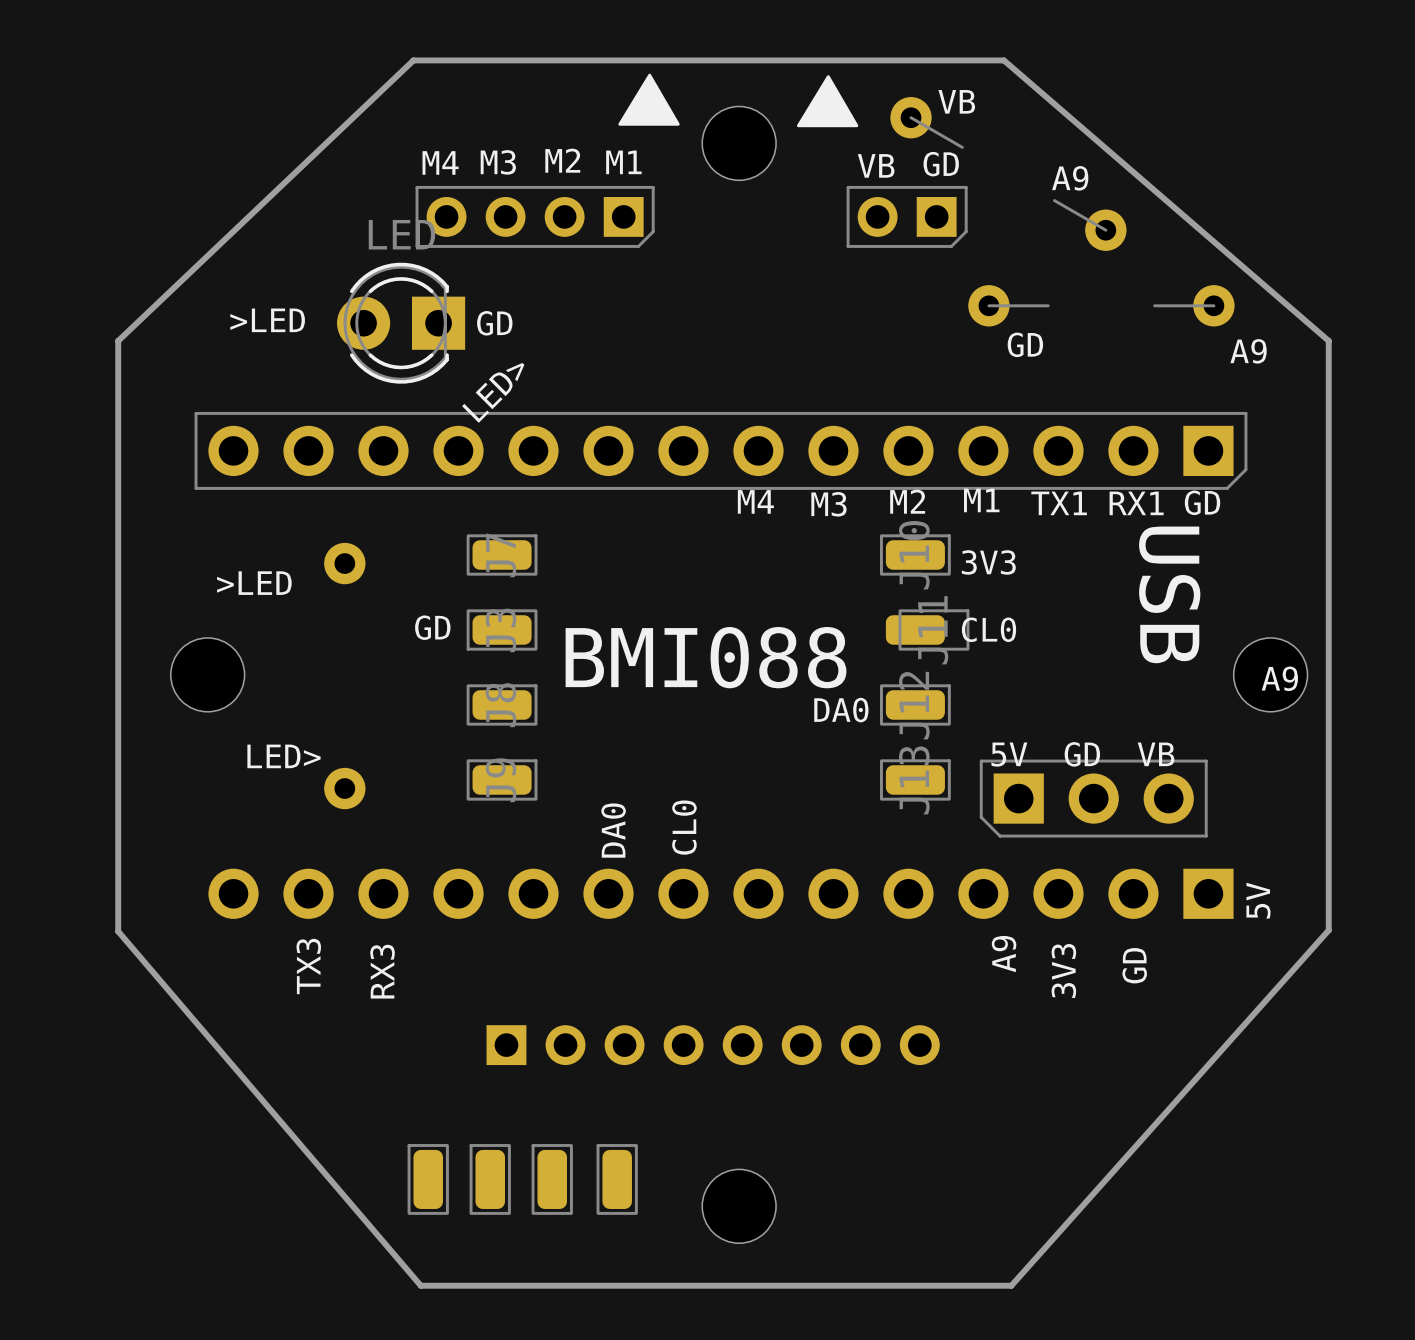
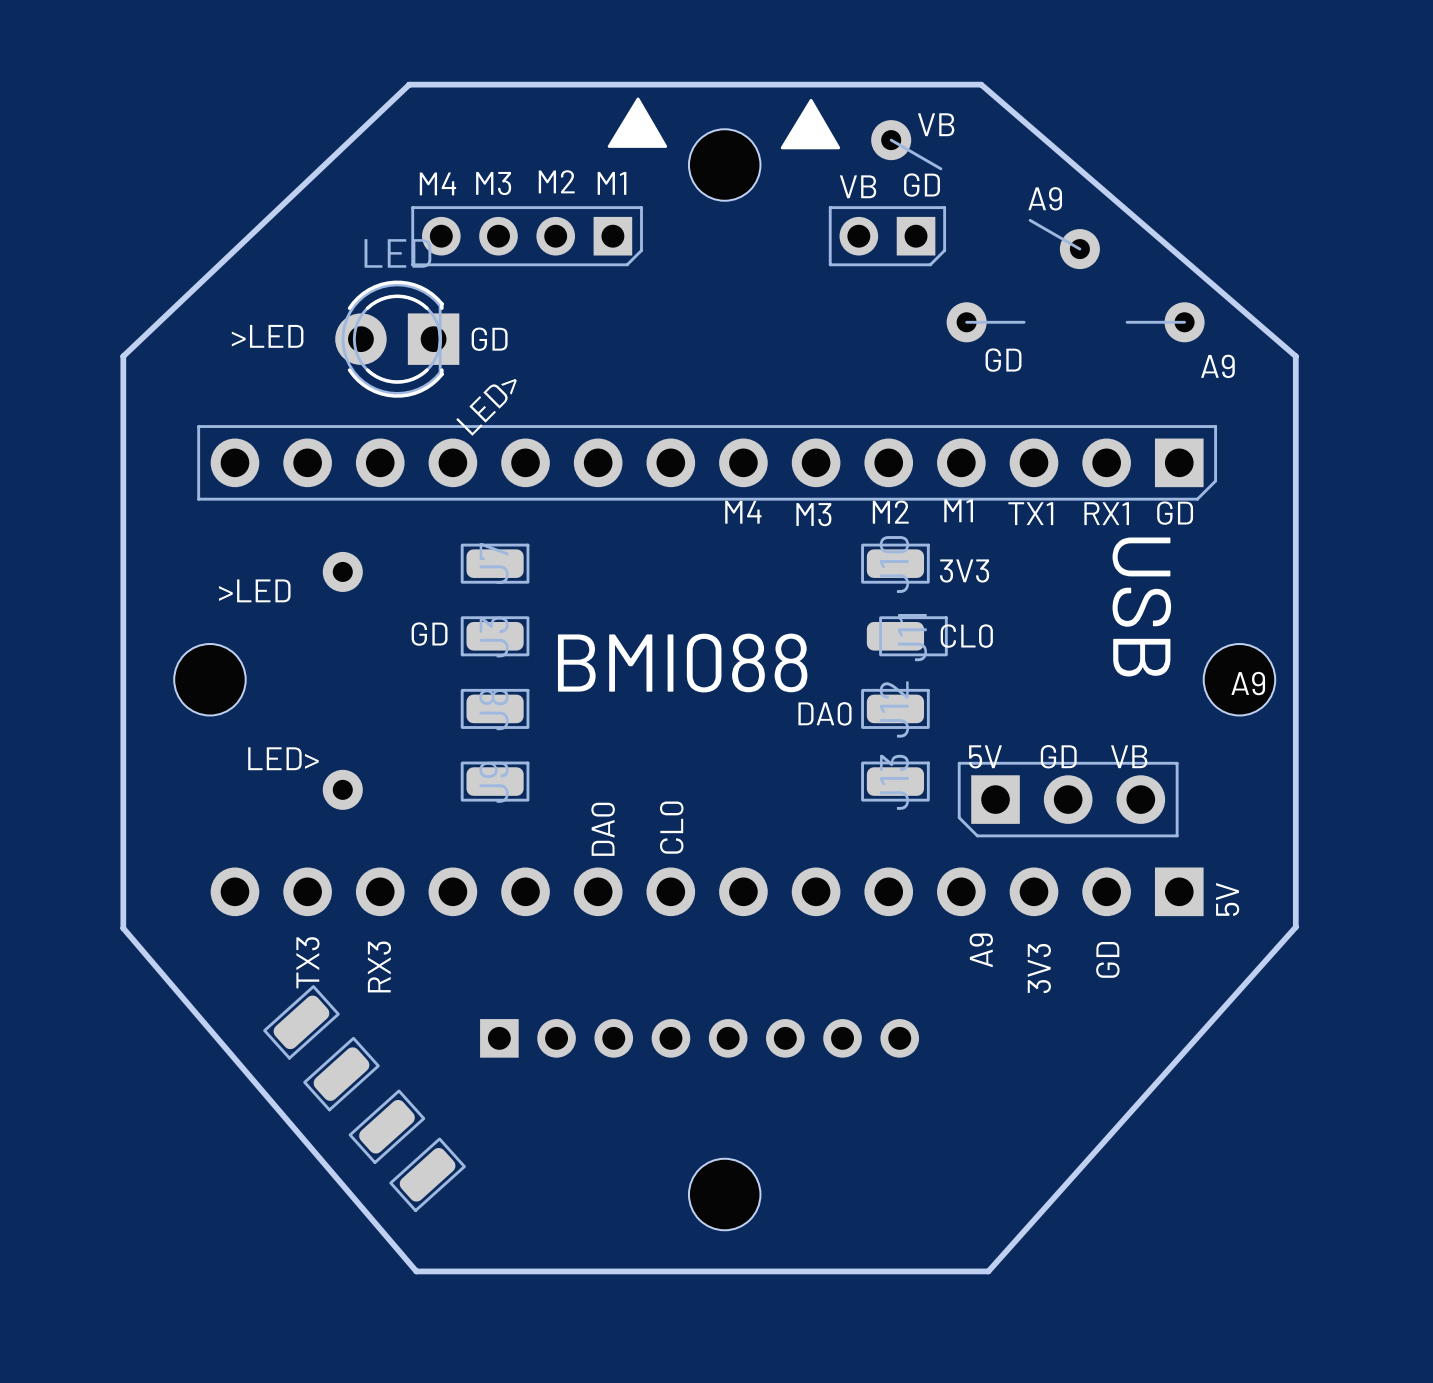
part: none -> (301, 1022)
part: none -> (341, 1074)
part: none -> (386, 1126)
part rotation: 0° (428, 1179) -> 48° clockwise (427, 1174)
part: (490, 1179) -> none
part: (552, 1179) -> none
part: (617, 1179) -> none

